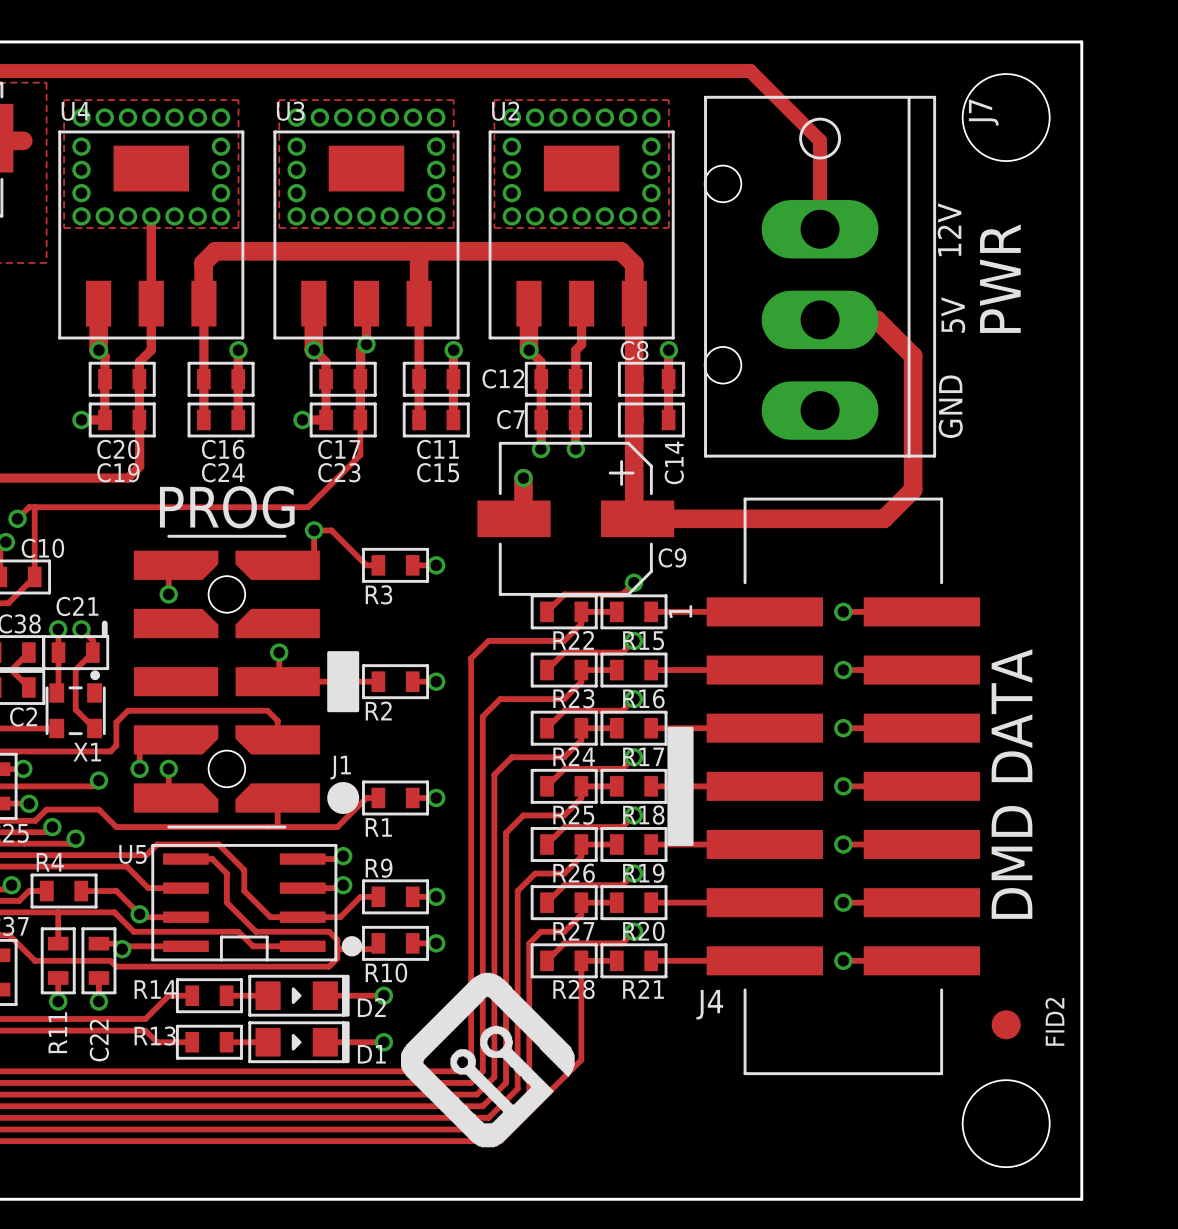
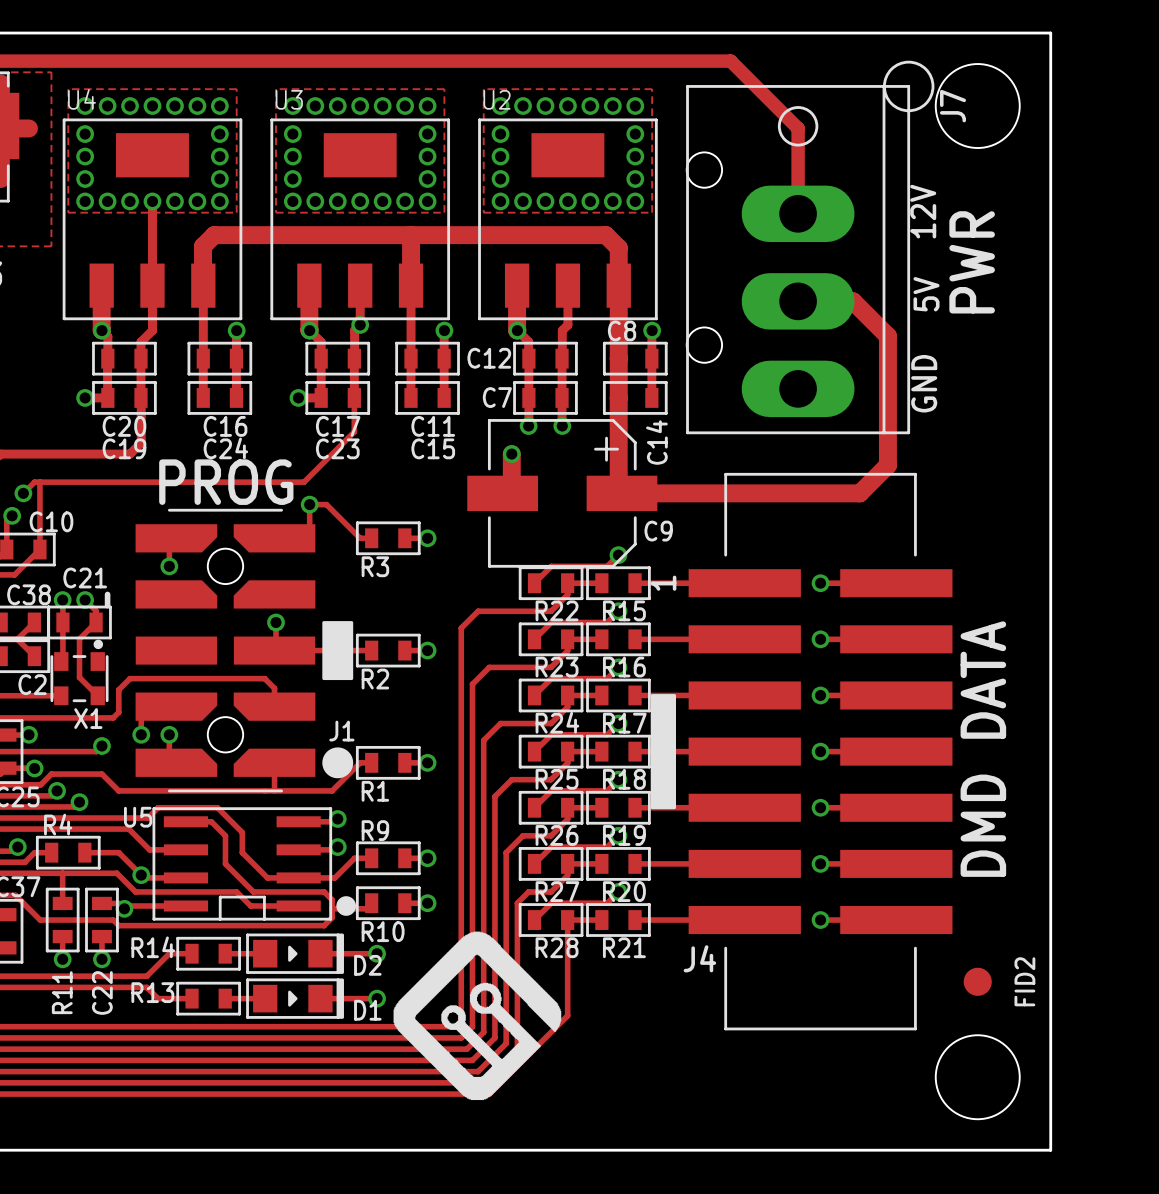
J7 footprint: [704, 95, 937, 458] -> [686, 60, 935, 435]

